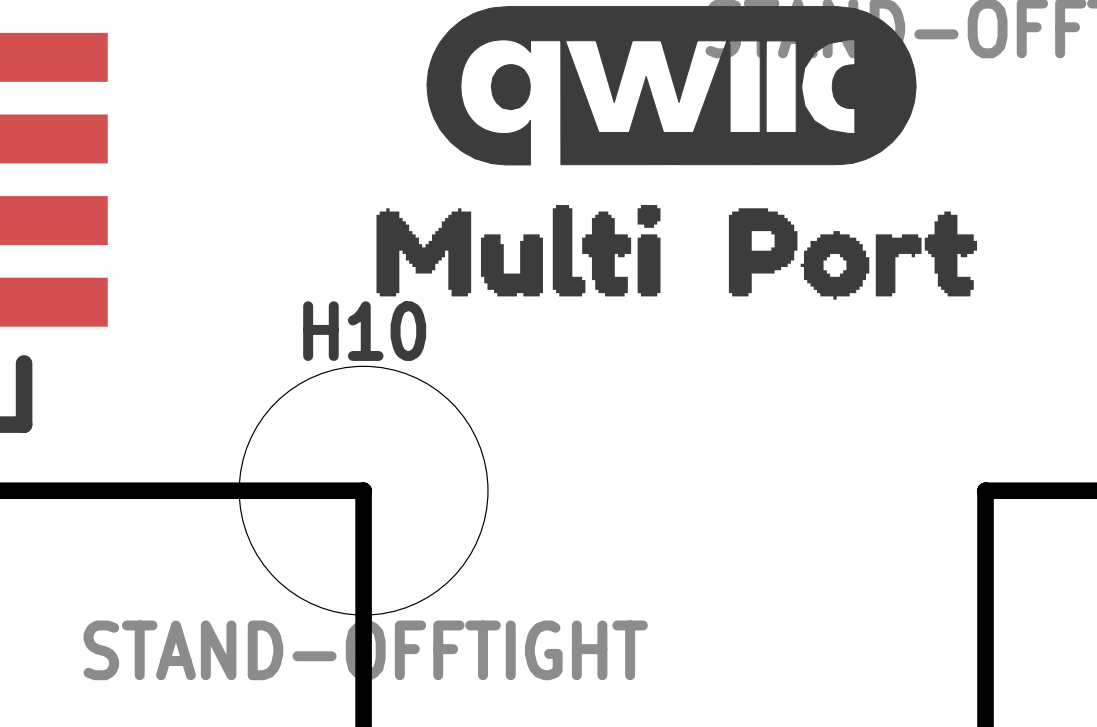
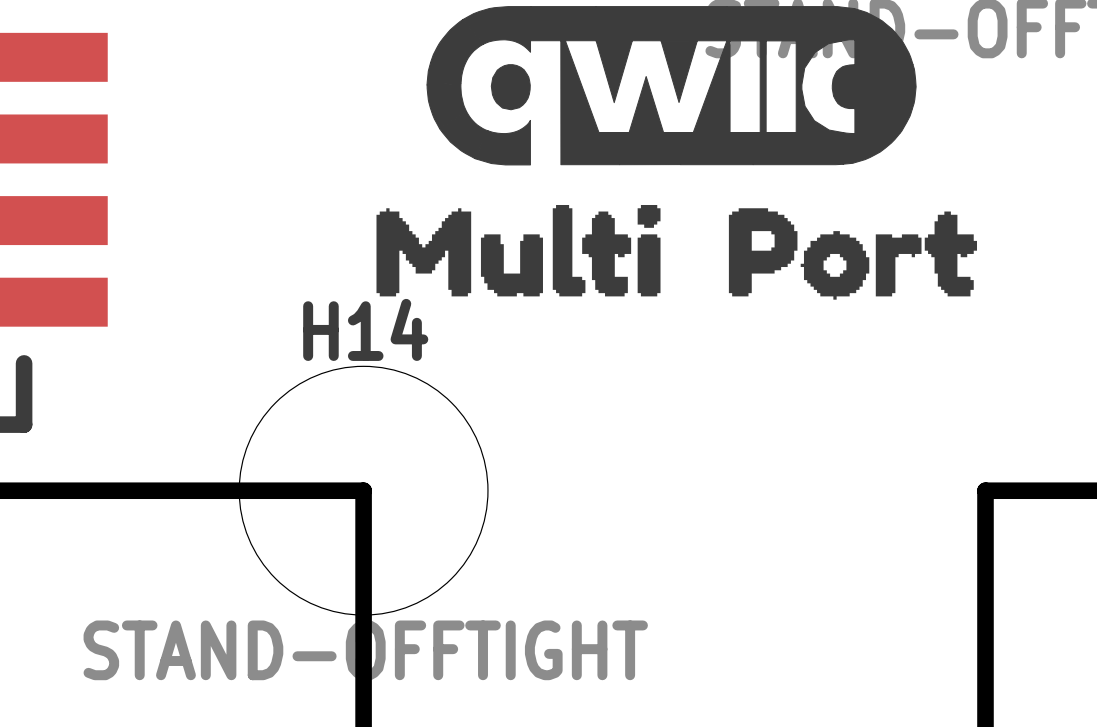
H10 name: H10 (364, 331) -> H14 (365, 329)

